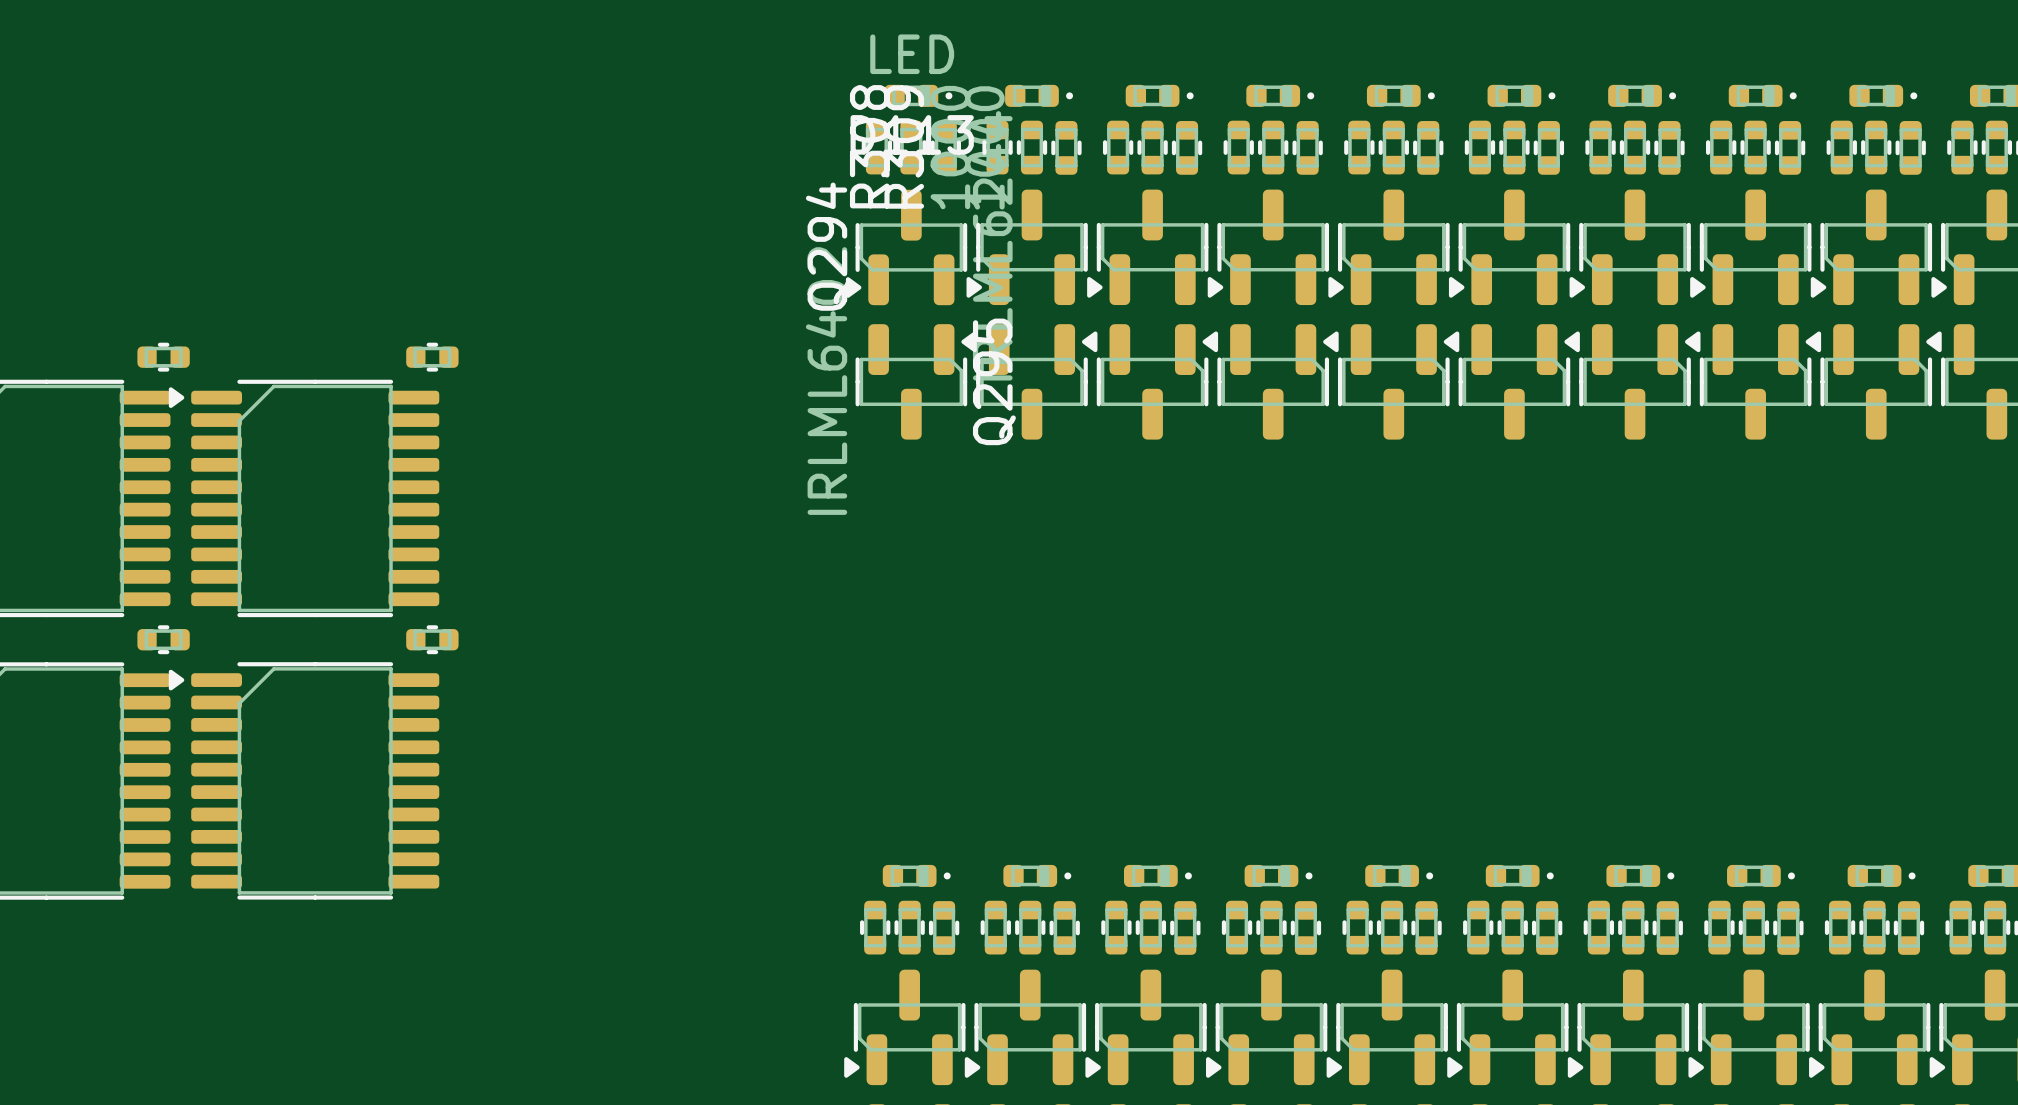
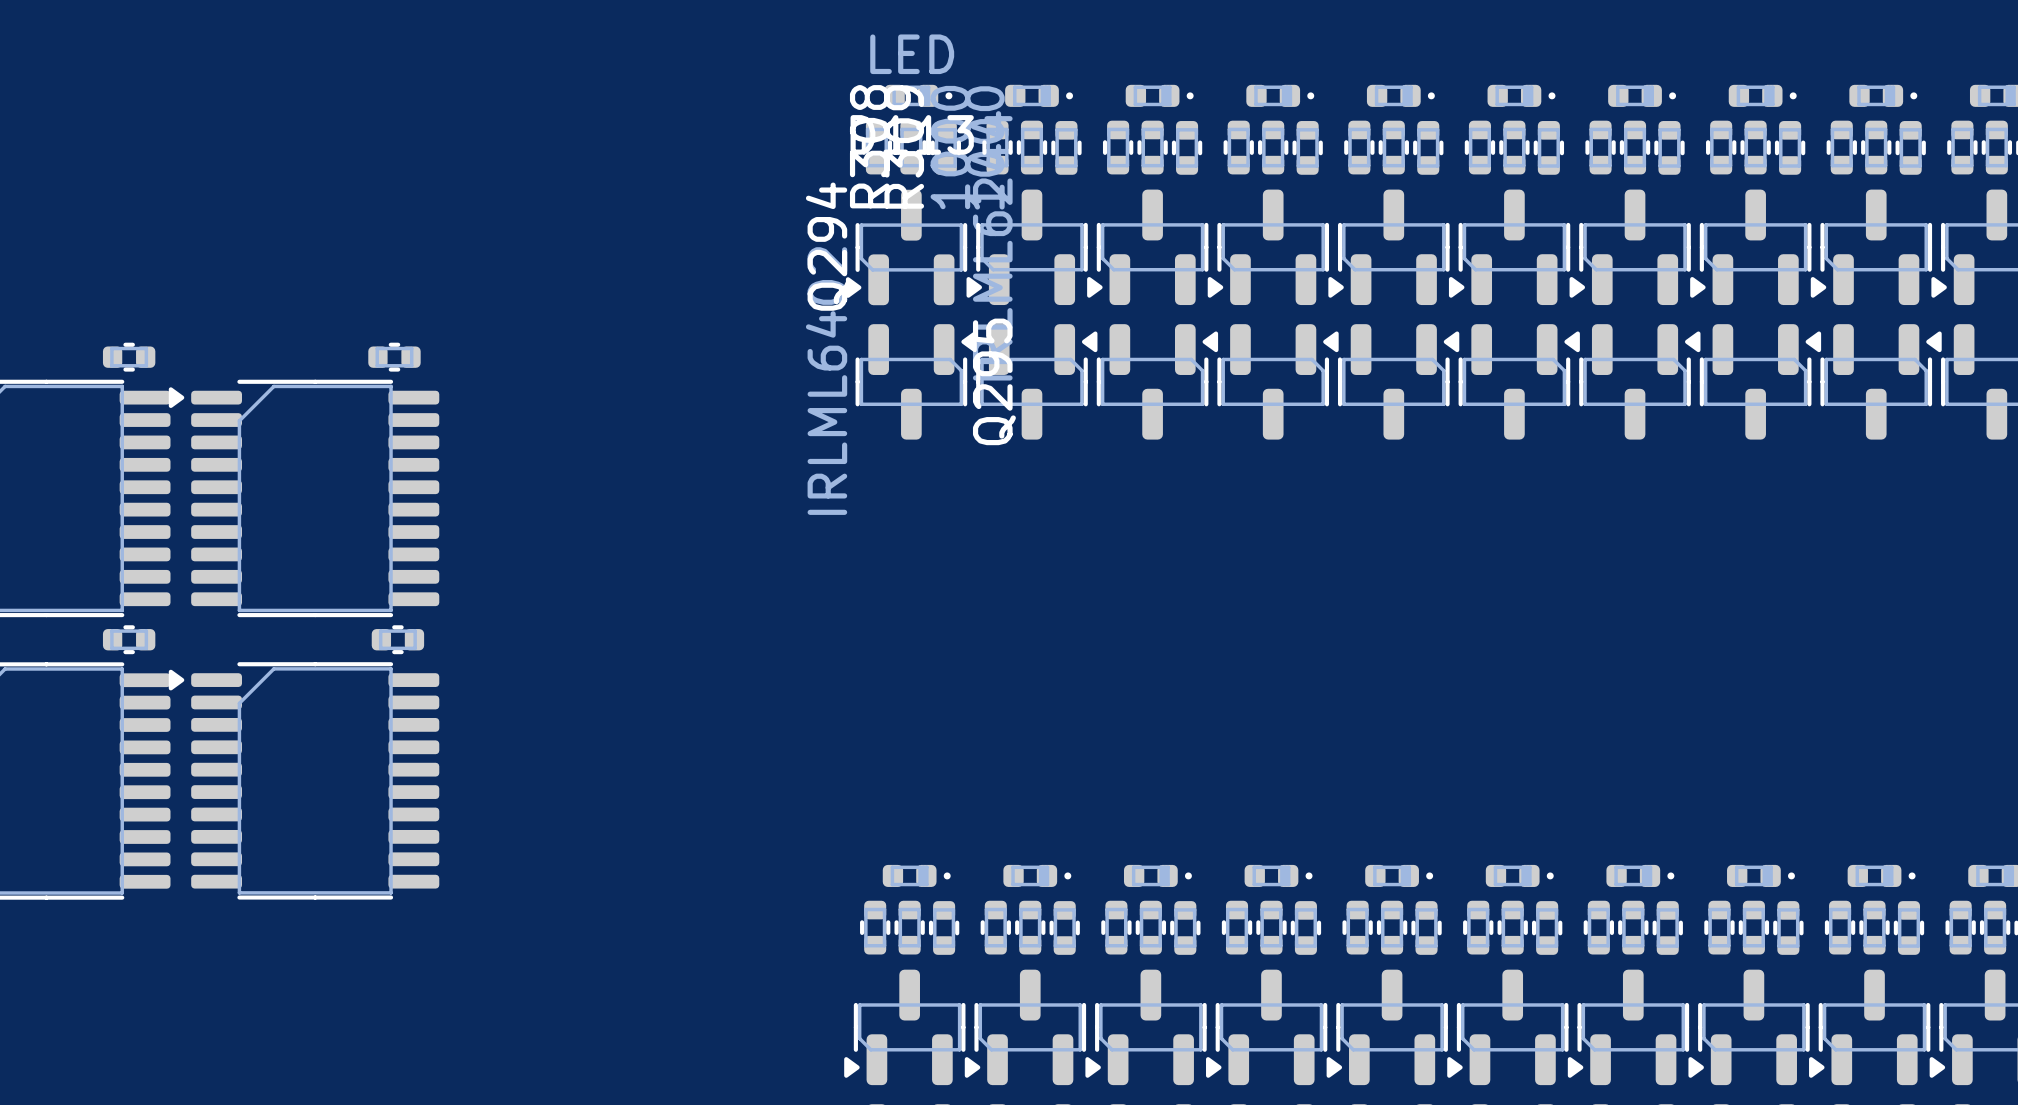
part position: (163, 357) -> (129, 357)
part position: (432, 357) -> (394, 357)
part position: (163, 639) -> (129, 639)
part position: (432, 639) -> (397, 639)

